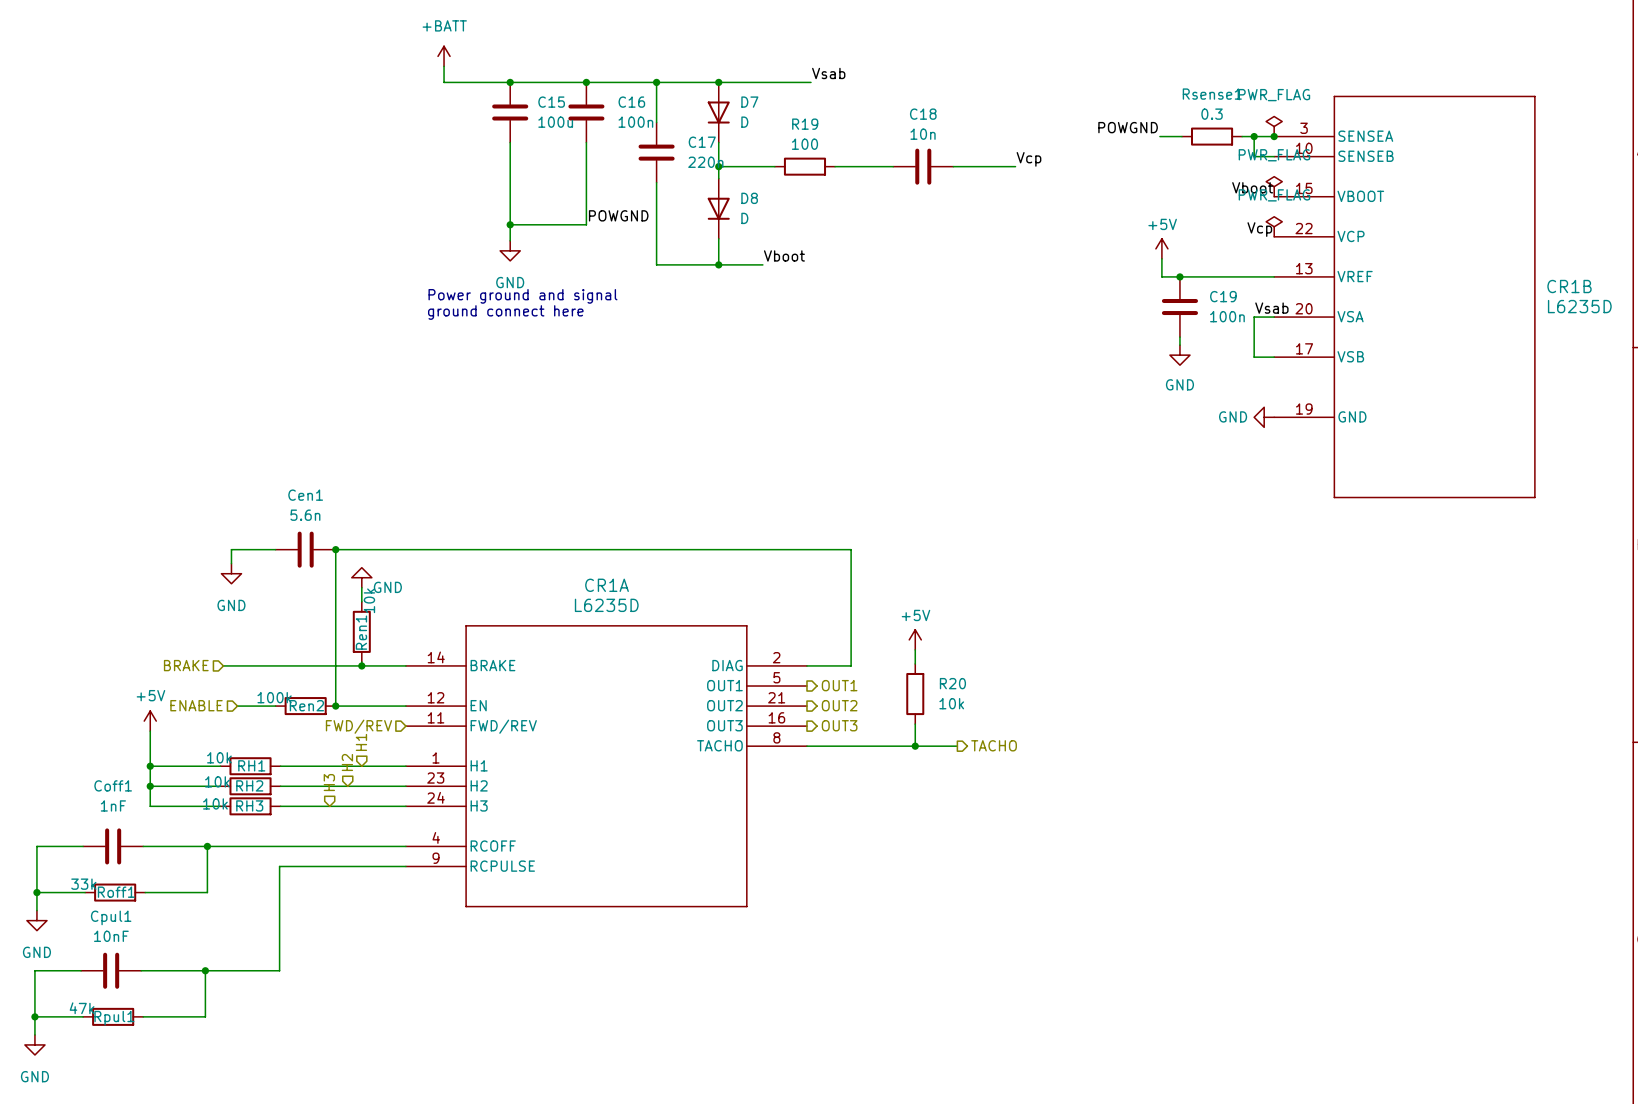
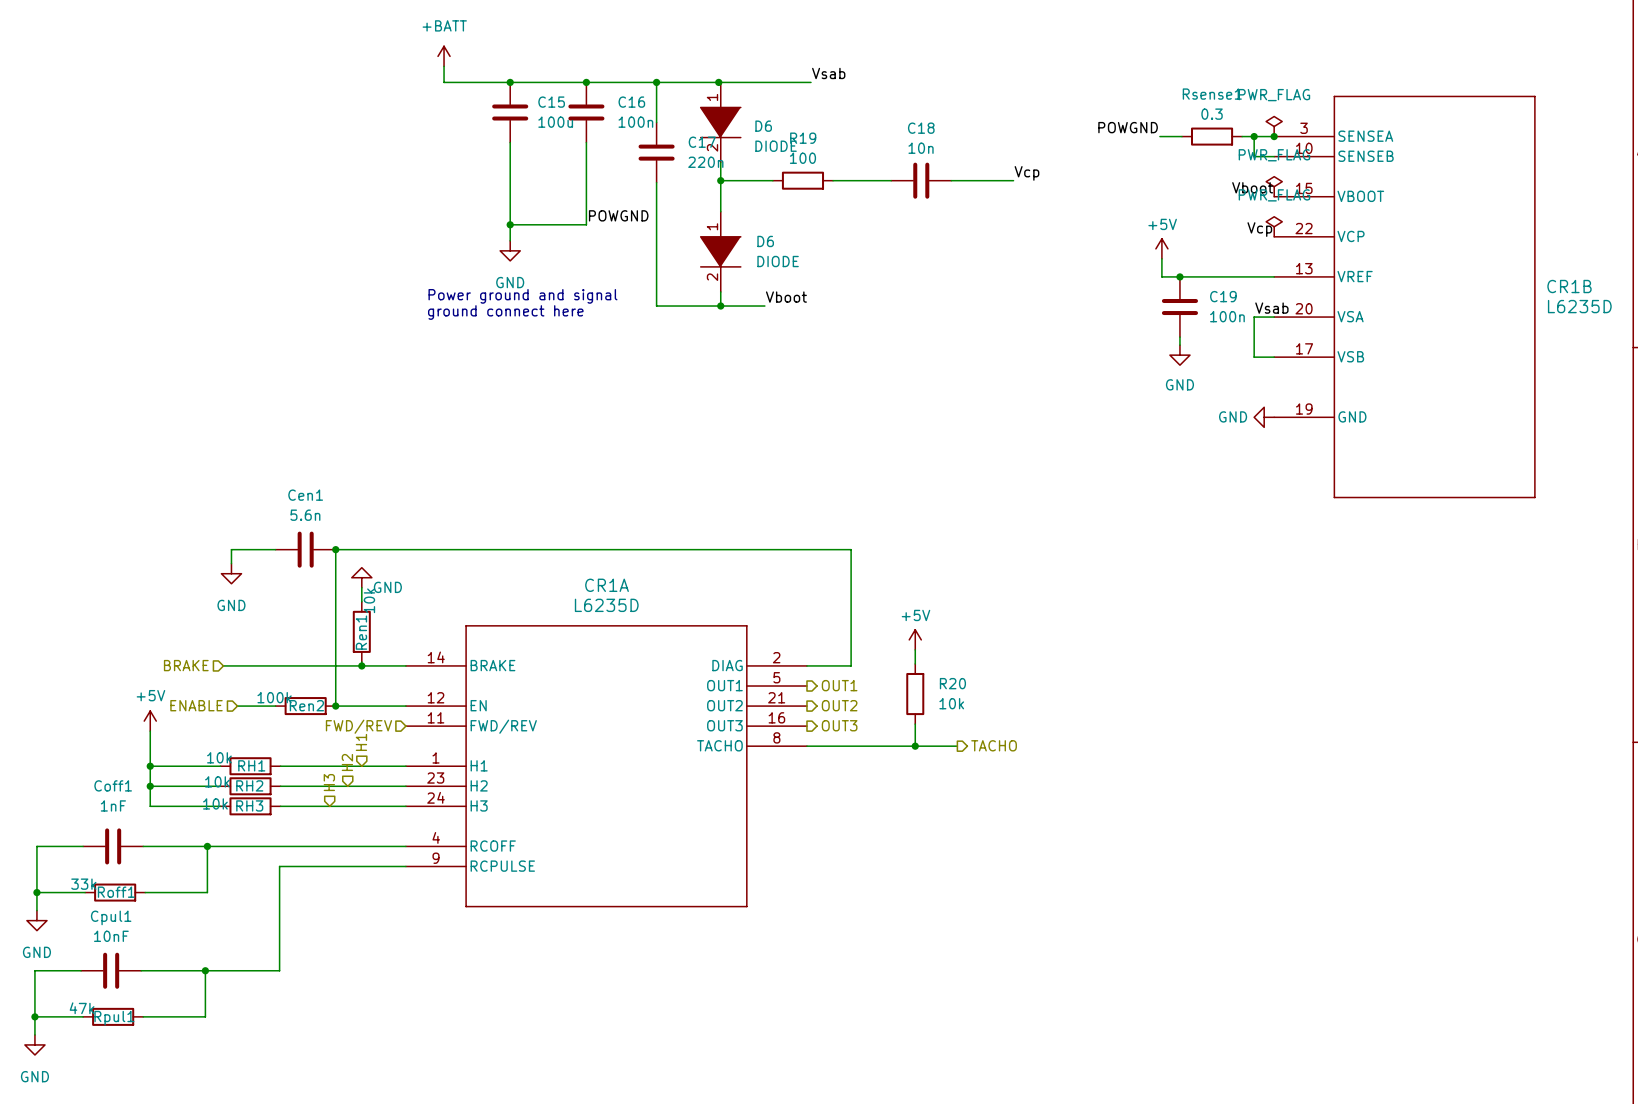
D7: D (718, 112) -> none
D6: none -> DIODE (720, 122)
wire: (718, 142) (718, 178) -> none
label position: Vcp (1028, 159) -> Vcp (1026, 173)
wire: none -> (720, 162) (720, 211)
wire: (718, 166) (774, 166) -> none
junction position: (718, 166) -> (720, 180)
R19 position: (804, 166) -> (802, 180)
wire: (835, 166) (893, 166) -> (833, 180) (891, 180)
C18 position: (923, 166) -> (921, 180)
wire: (953, 166) (1015, 166) -> (951, 180) (1013, 180)
wire: none -> (720, 180) (772, 180)
D8: D (718, 208) -> none
D6: none -> DIODE (720, 251)
label position: Vboot (784, 255) -> Vboot (786, 297)
wire: (656, 264) (762, 264) -> (656, 264) (656, 306) (764, 306)
junction position: (718, 264) -> (720, 306)
wire: none -> (720, 291) (720, 306)

